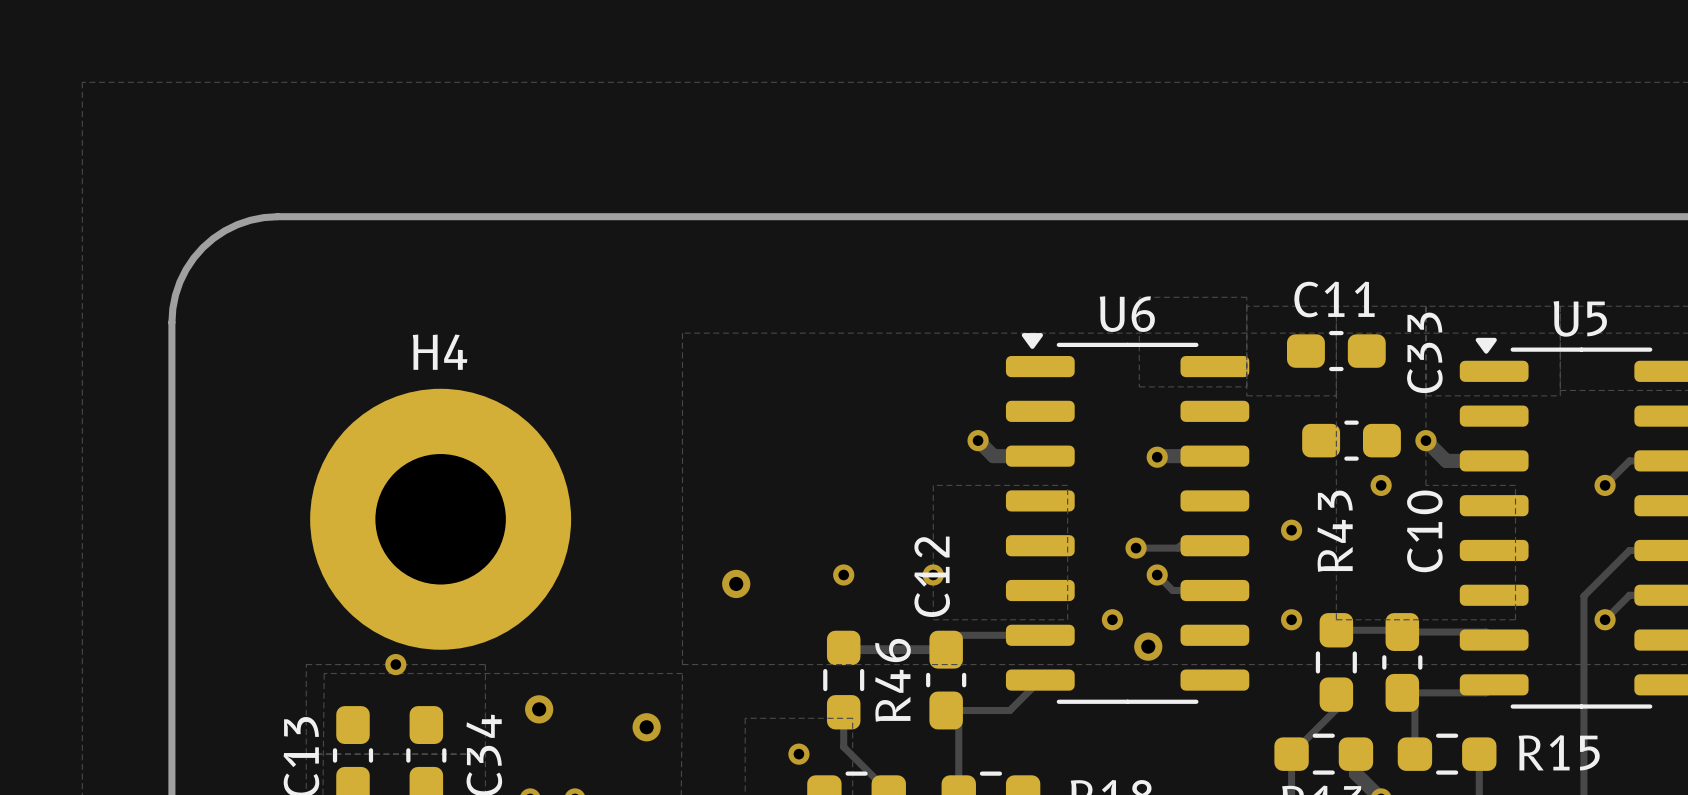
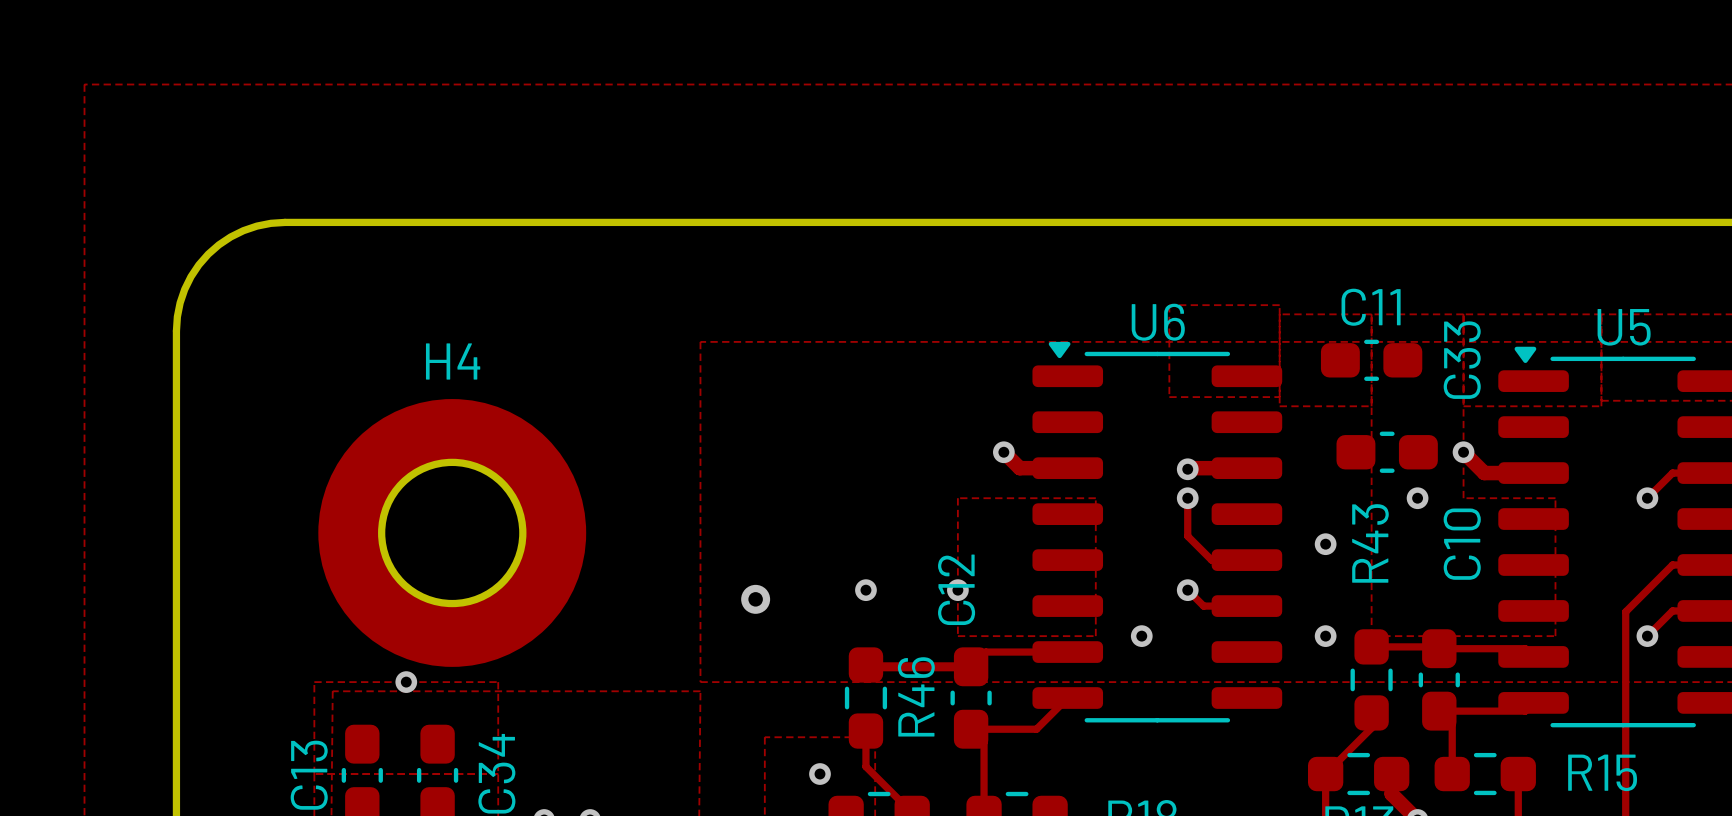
track: (1180, 545) (1178, 548) (1136, 548) -> (1211, 560) (1187, 536) (1187, 498)
via position: (1136, 548) -> (1187, 498)
via: (1148, 646) -> none
via: (539, 709) -> none
via: (646, 727) -> none

